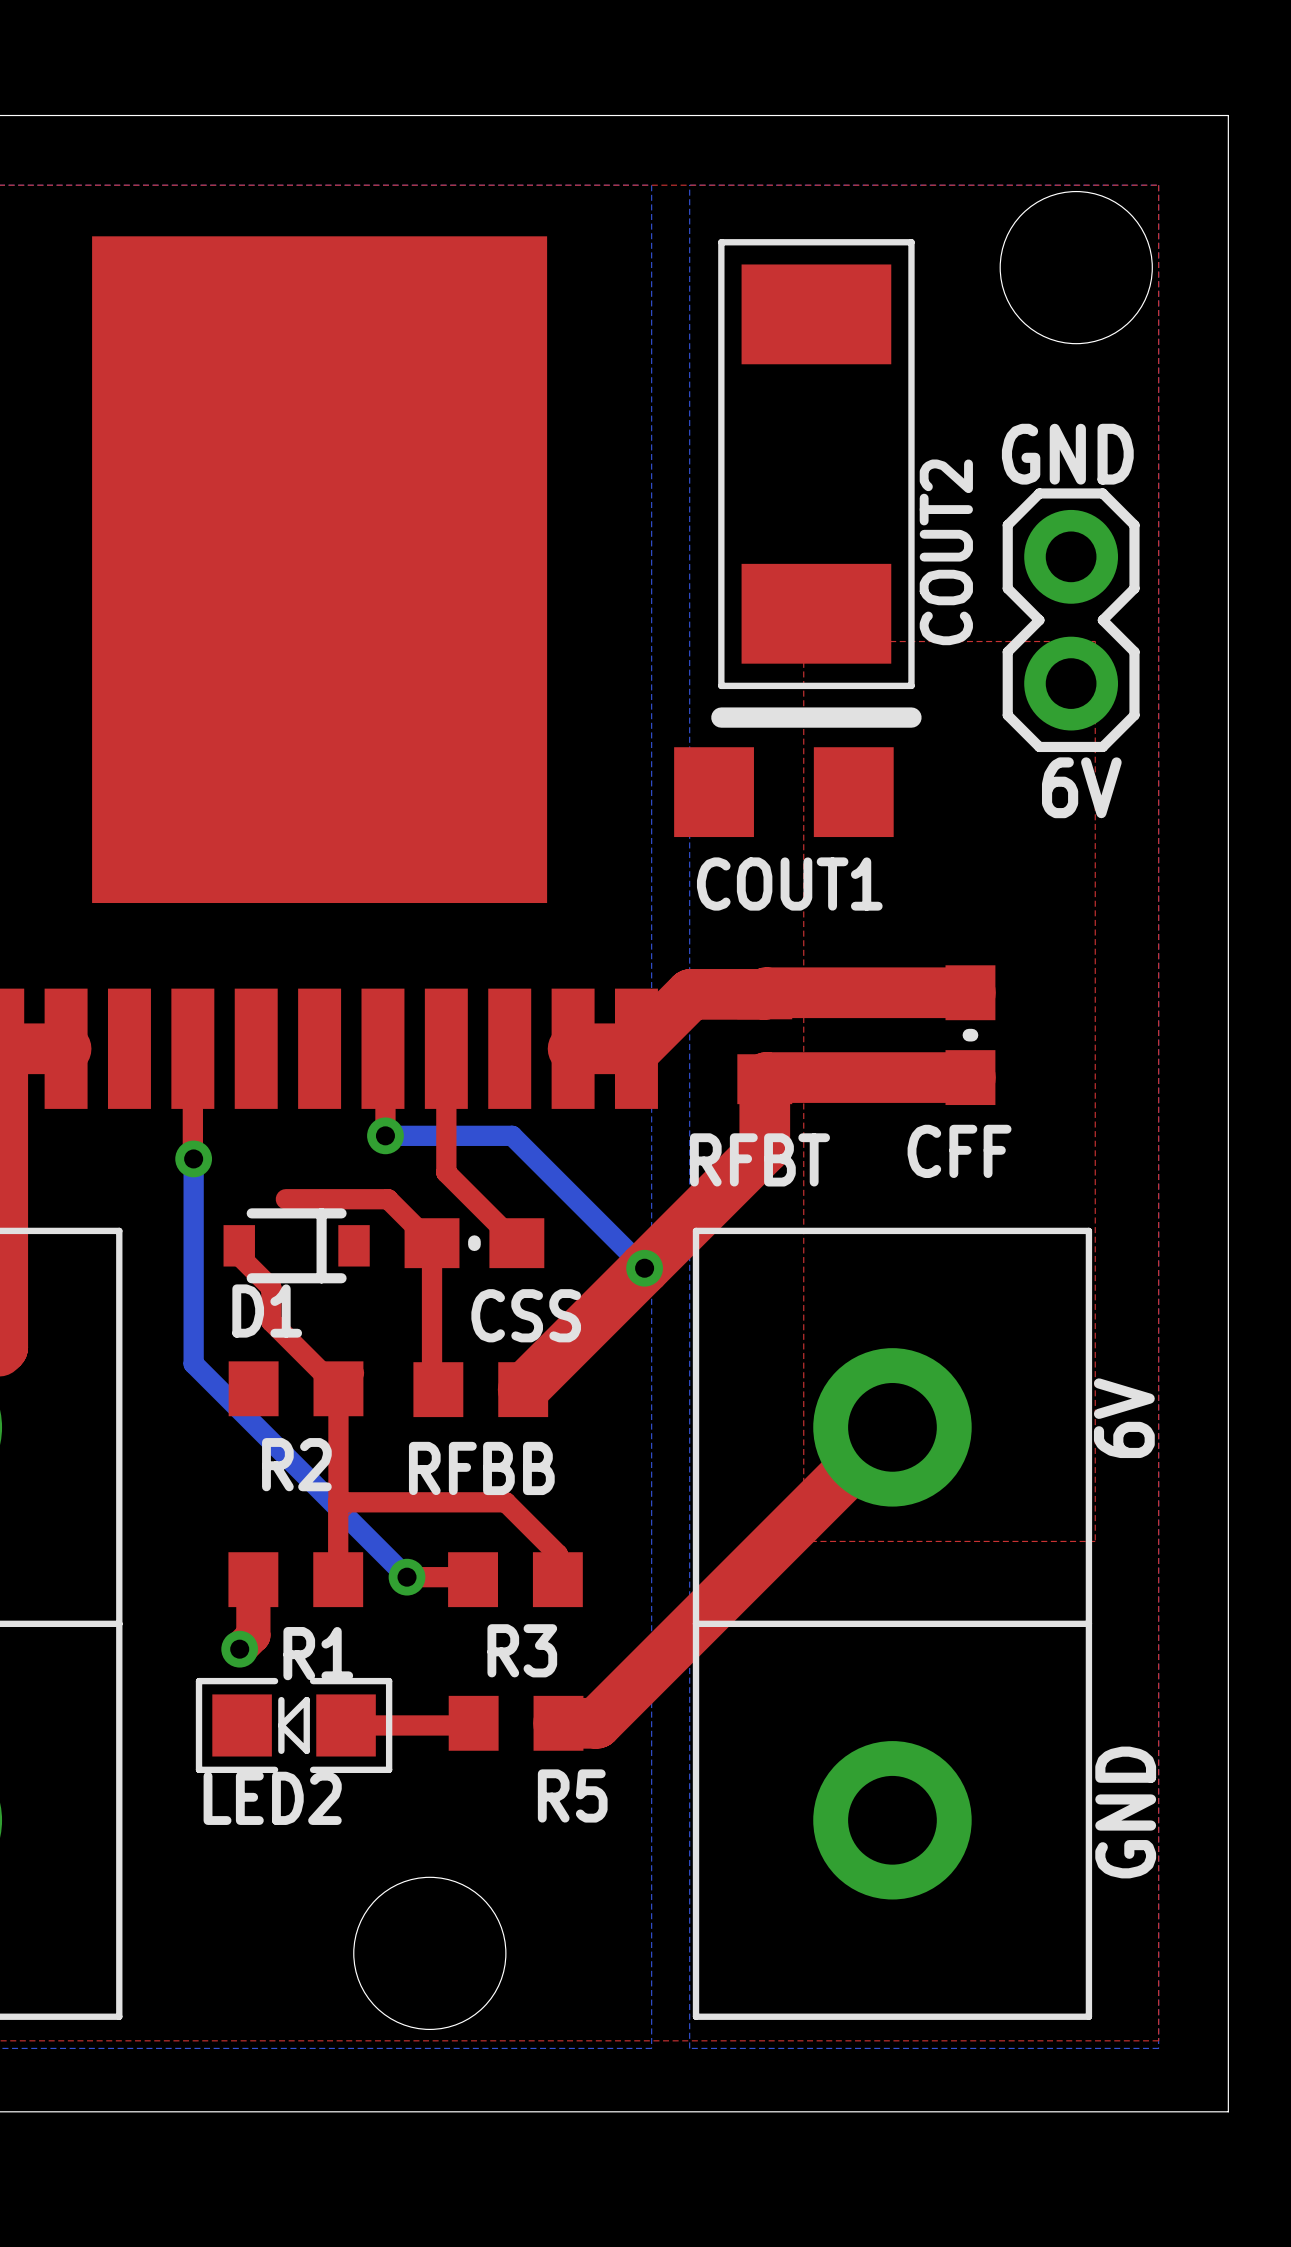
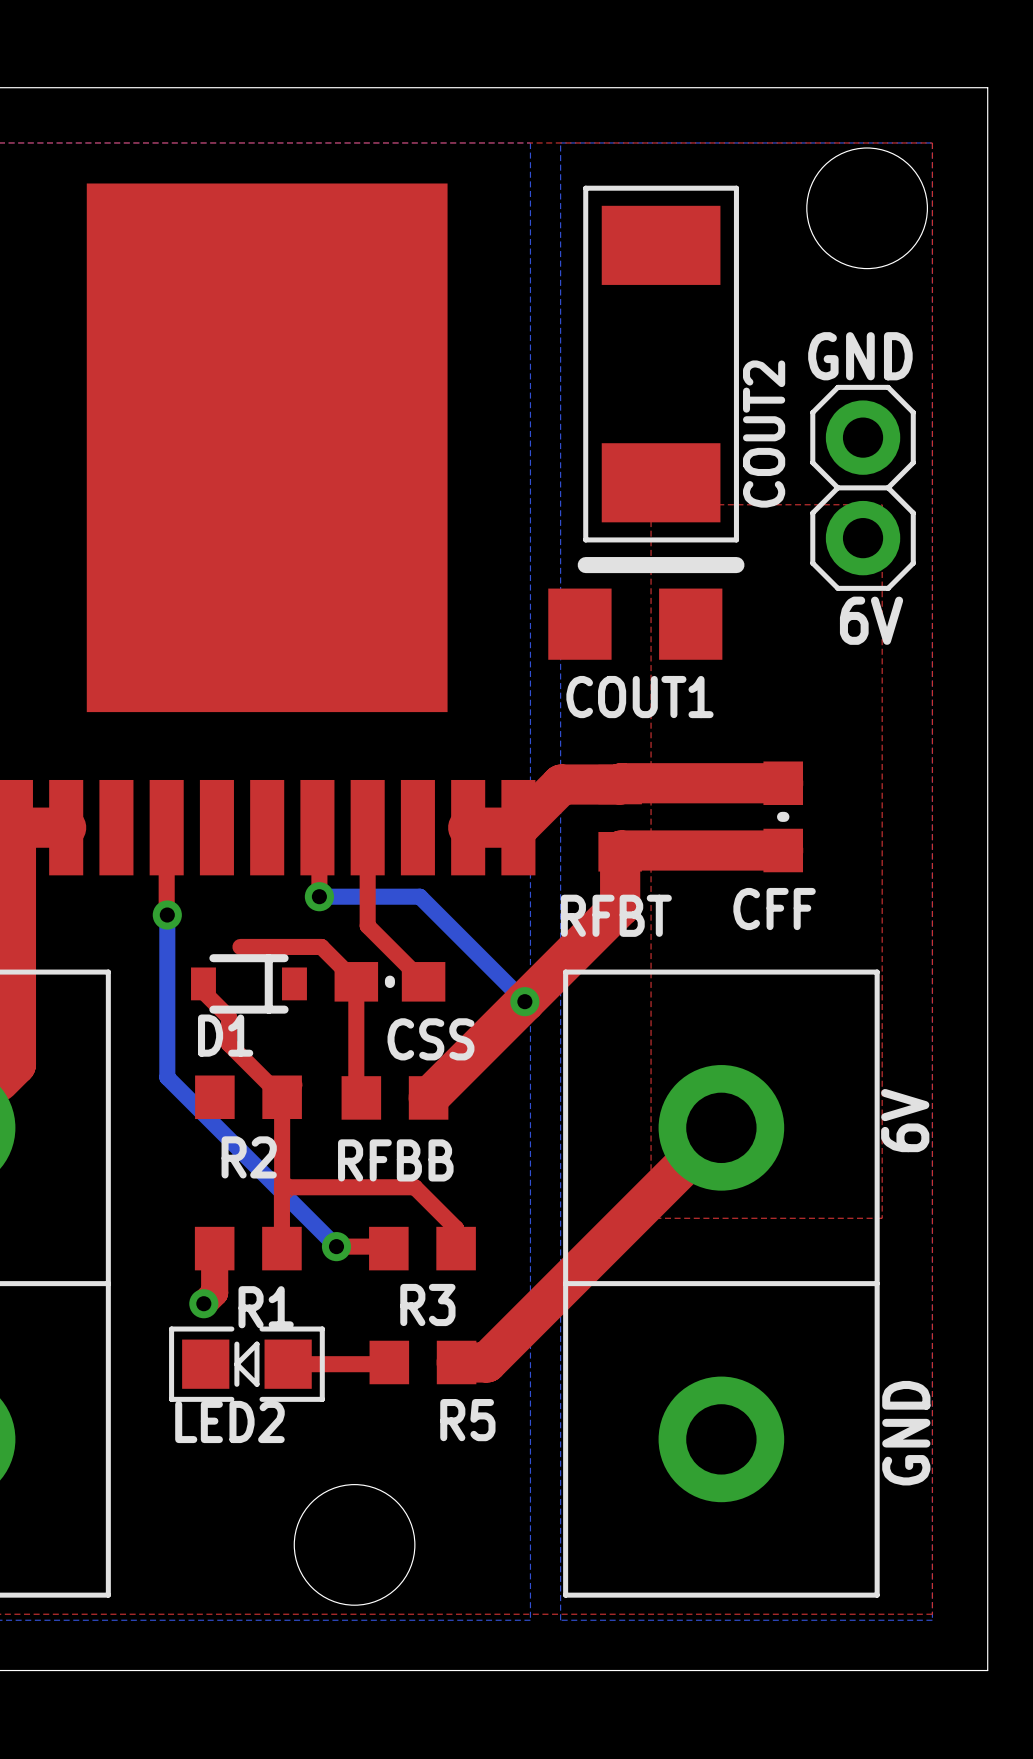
part footprint: [1002, 488, 1140, 753] -> [810, 384, 916, 591]

